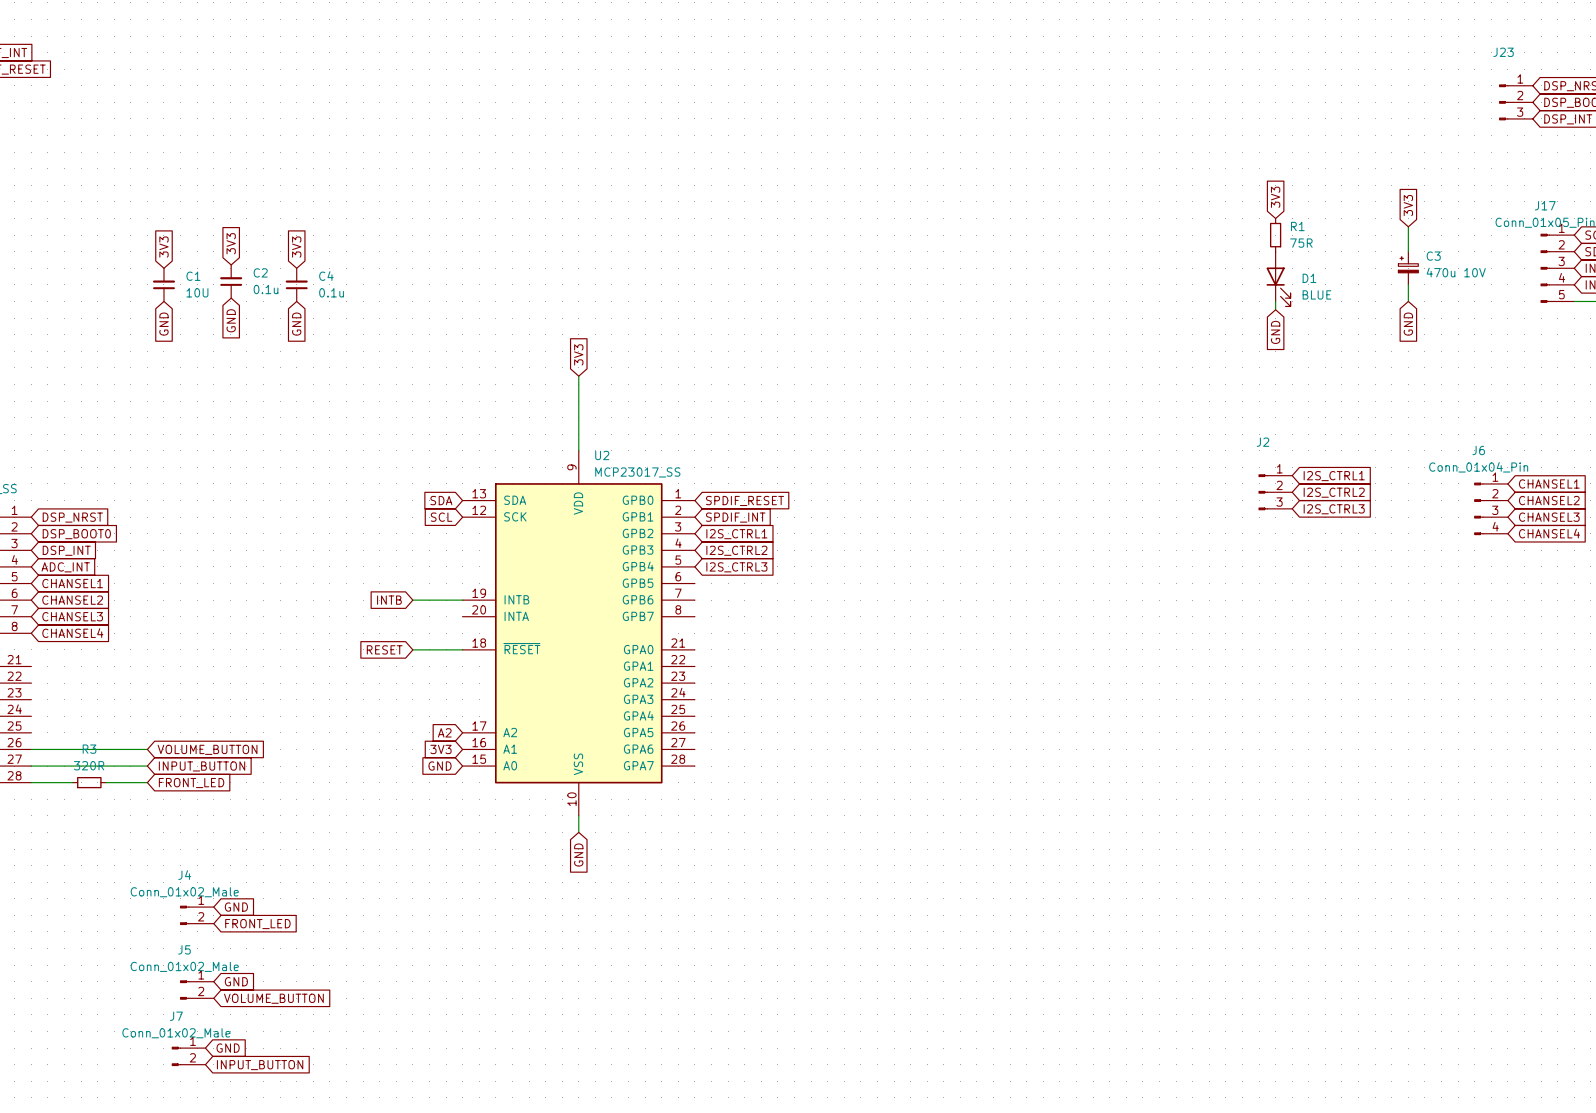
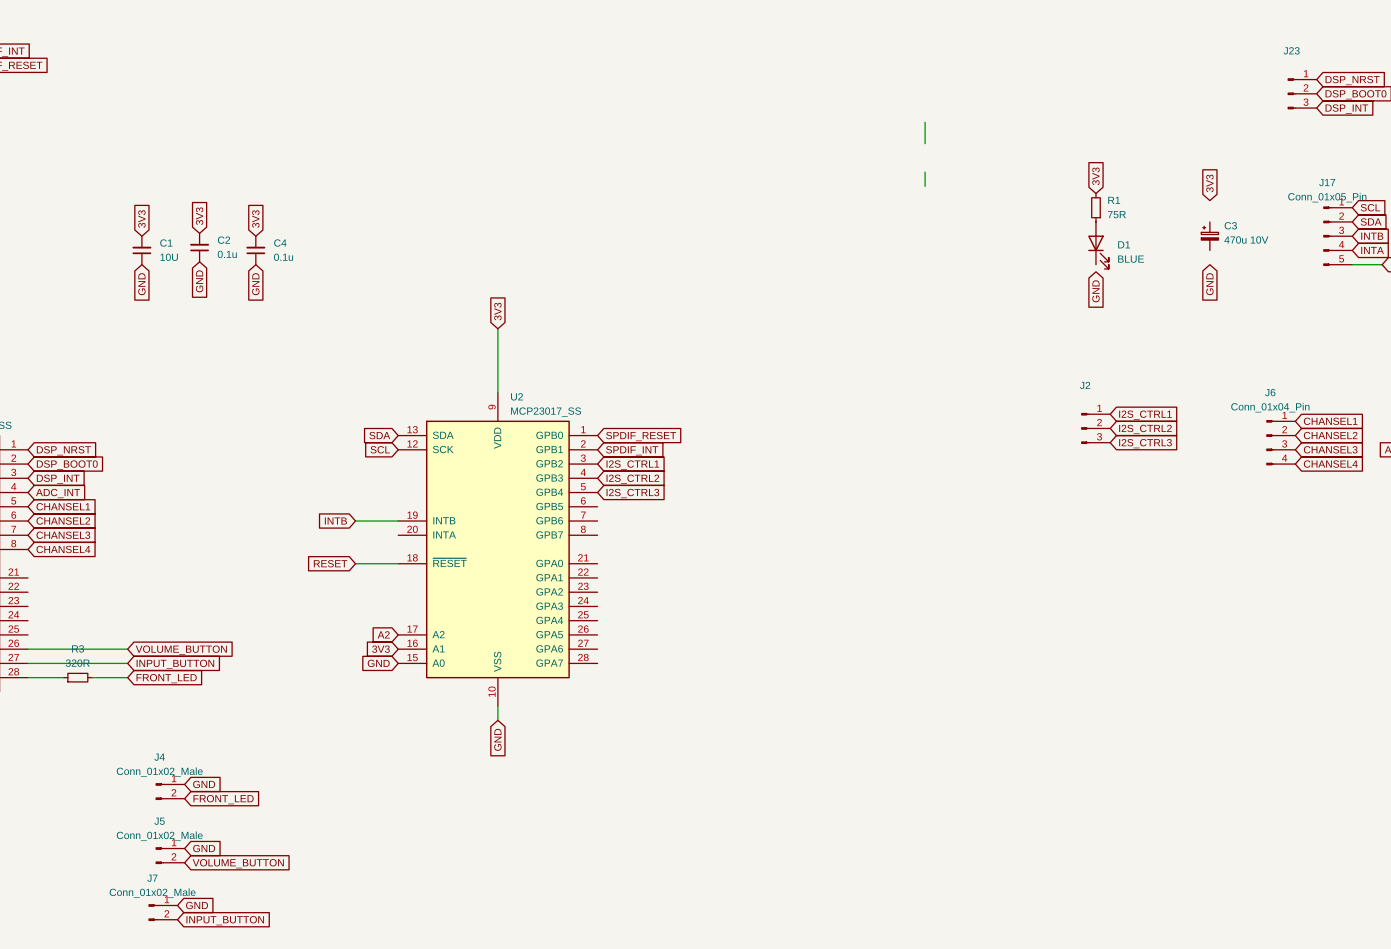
wire: none -> (925, 122) (925, 143)
wire: none -> (925, 172) (925, 186)
wire: (1408, 226) (1408, 251) -> none
wire: (1408, 284) (1408, 301) -> none
wire: (1275, 301) (1275, 309) -> none

